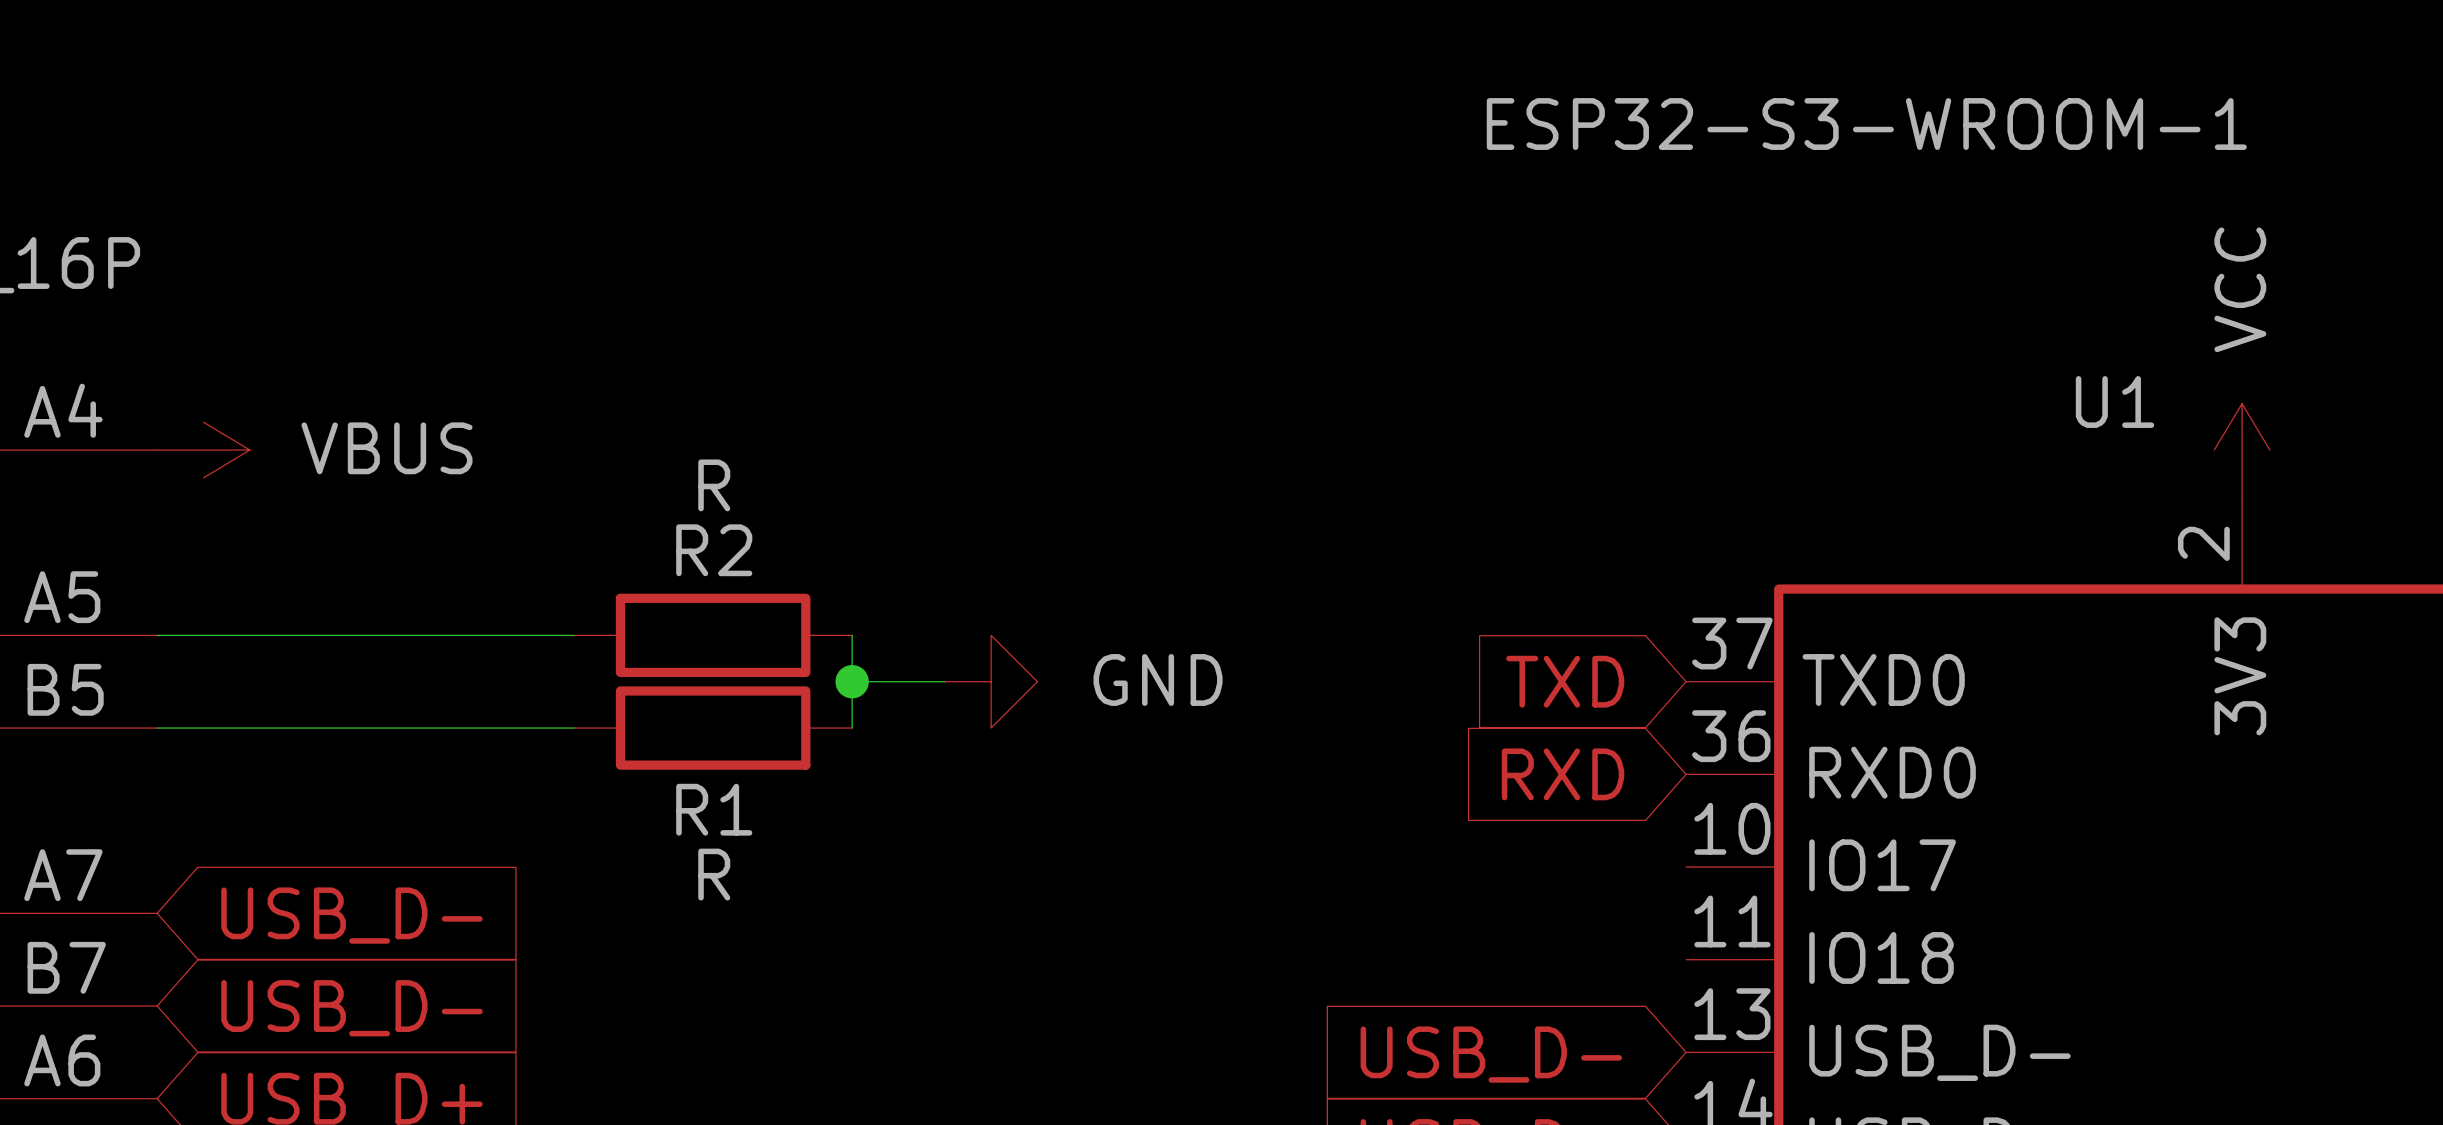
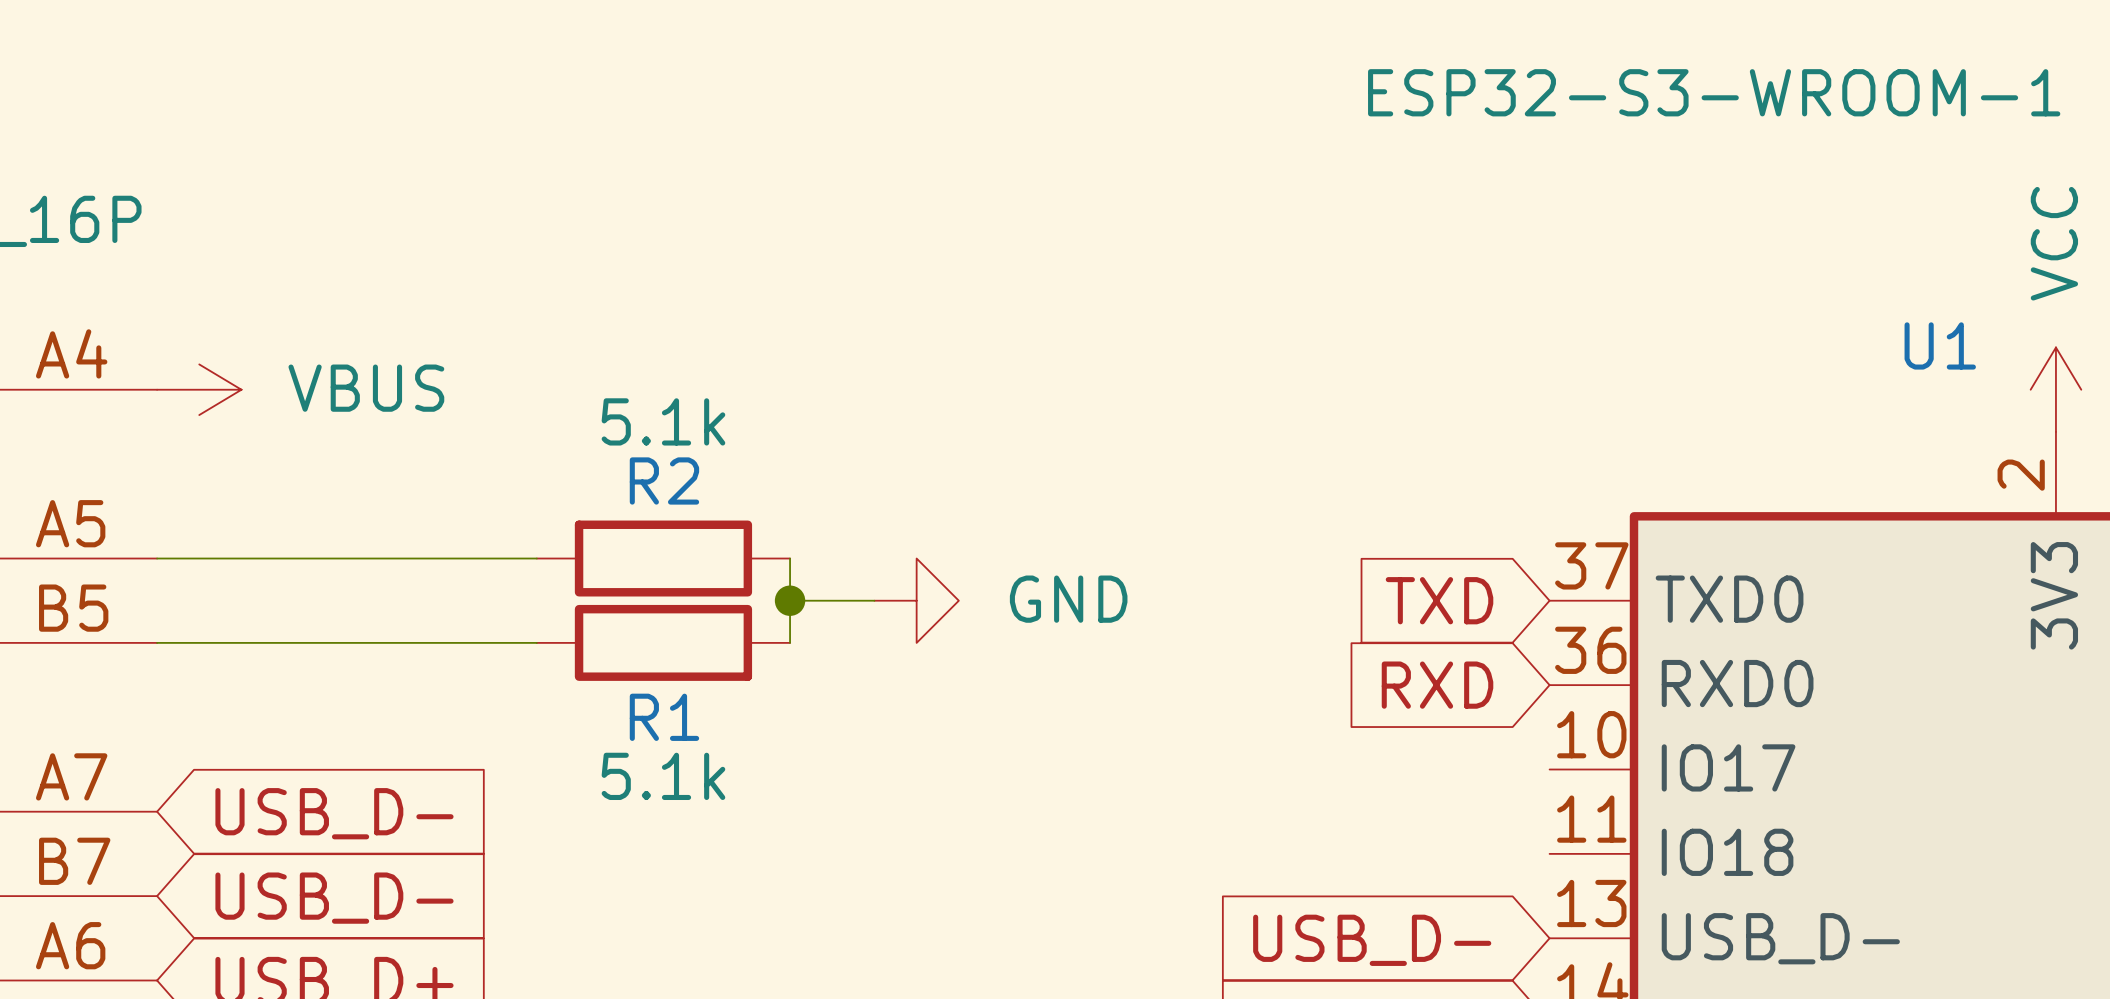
R2 value: R (714, 485) -> 5.1k (663, 421)
R1 value: R (714, 874) -> 5.1k (663, 776)

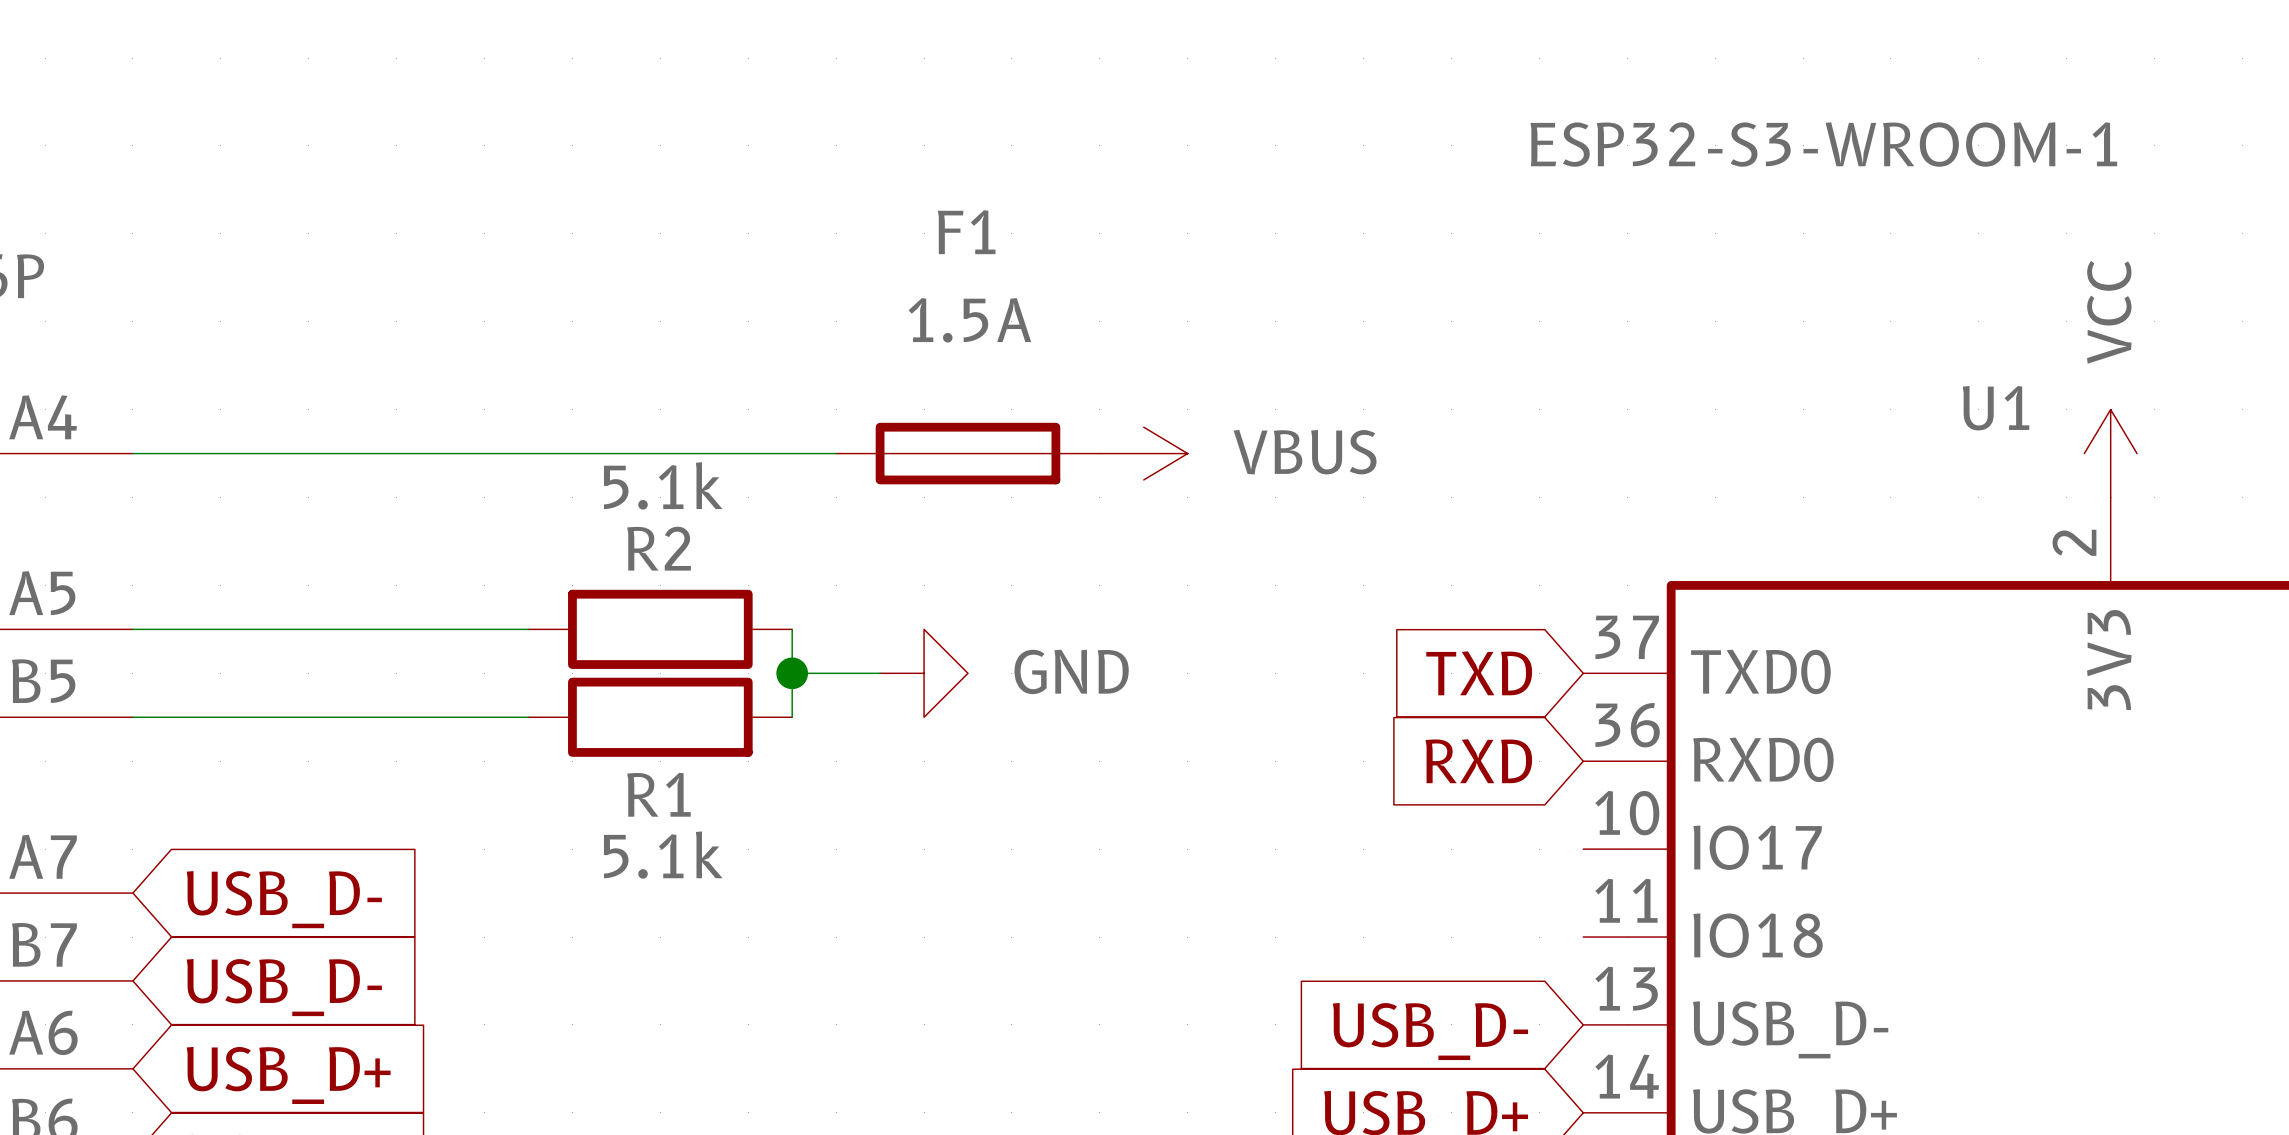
wire: none -> (132, 453) (836, 453)
power symbol: VBUS (199, 389) -> none
F1: none -> 1.5A (967, 453)
power symbol: none -> VBUS (1143, 453)

